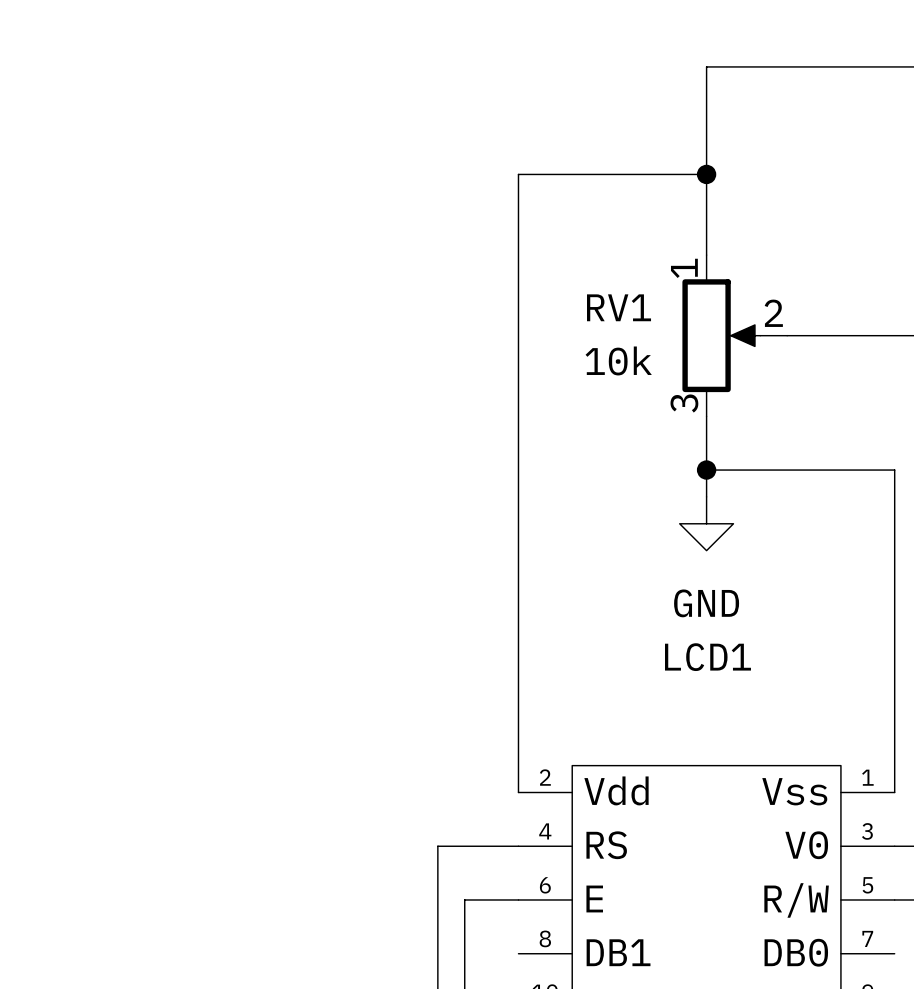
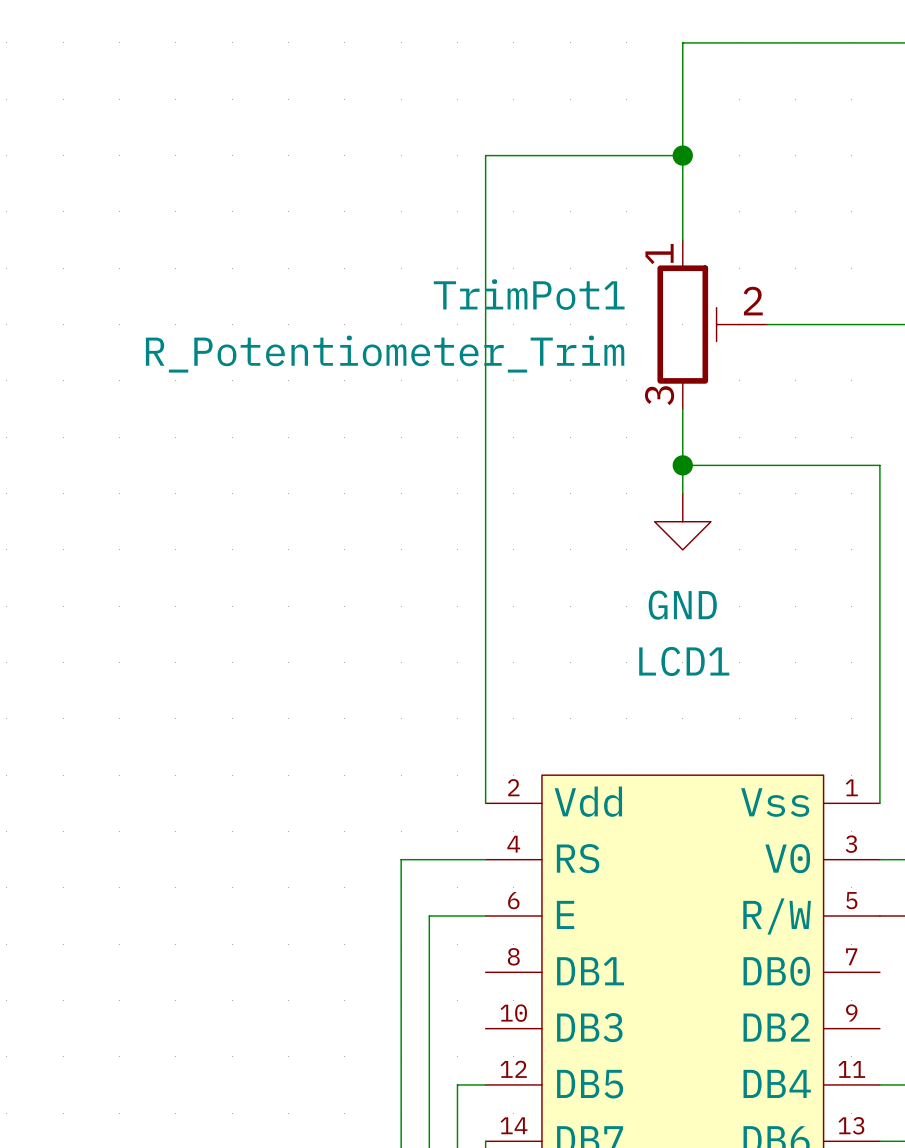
RV1: 10k (734, 335) -> none
TrimPot1: none -> R_Potentiometer_Trim (712, 324)

